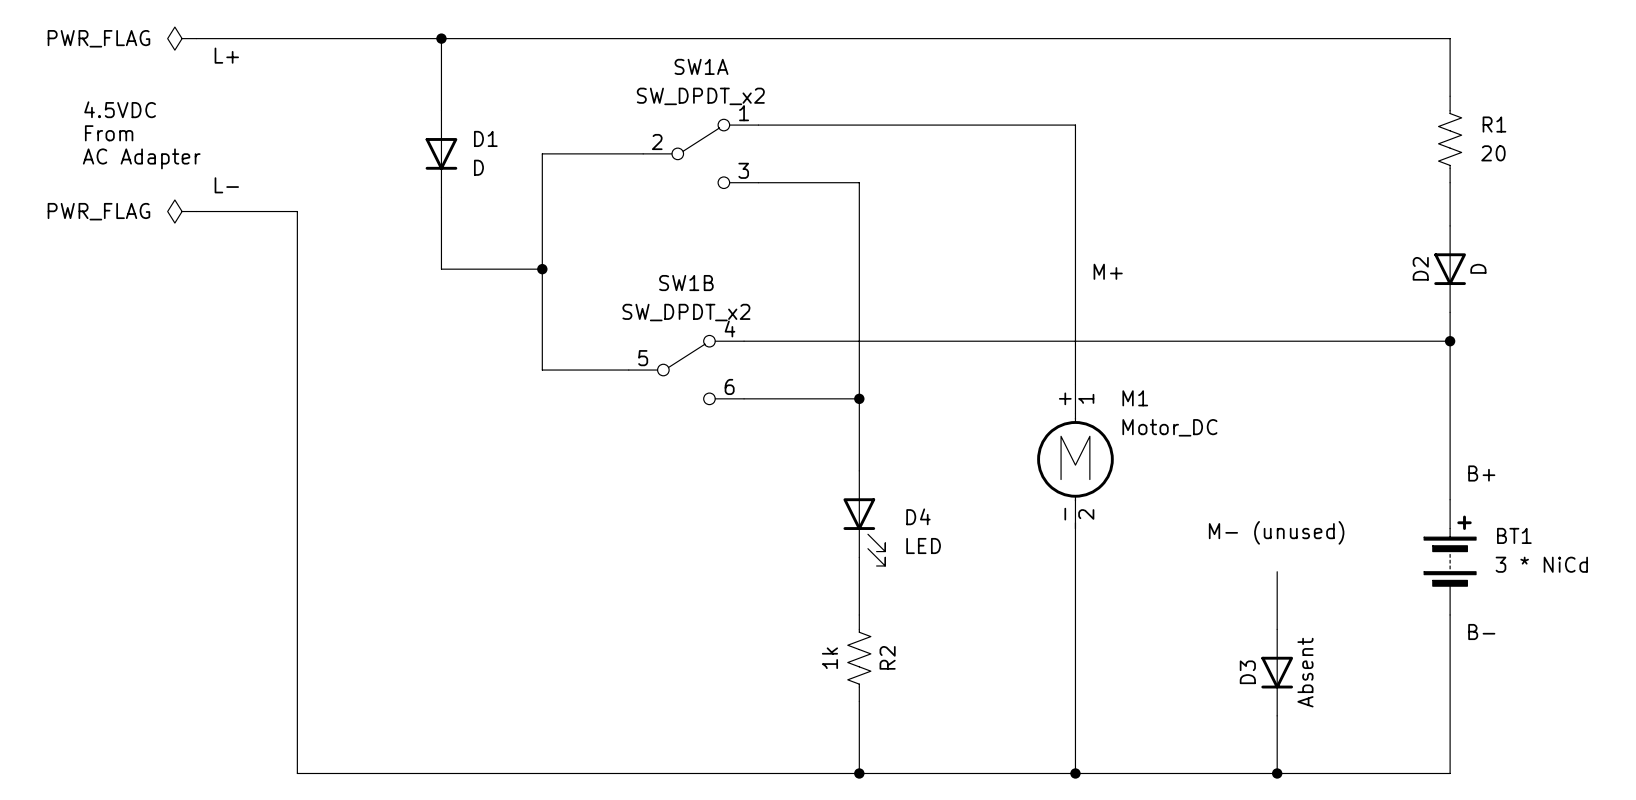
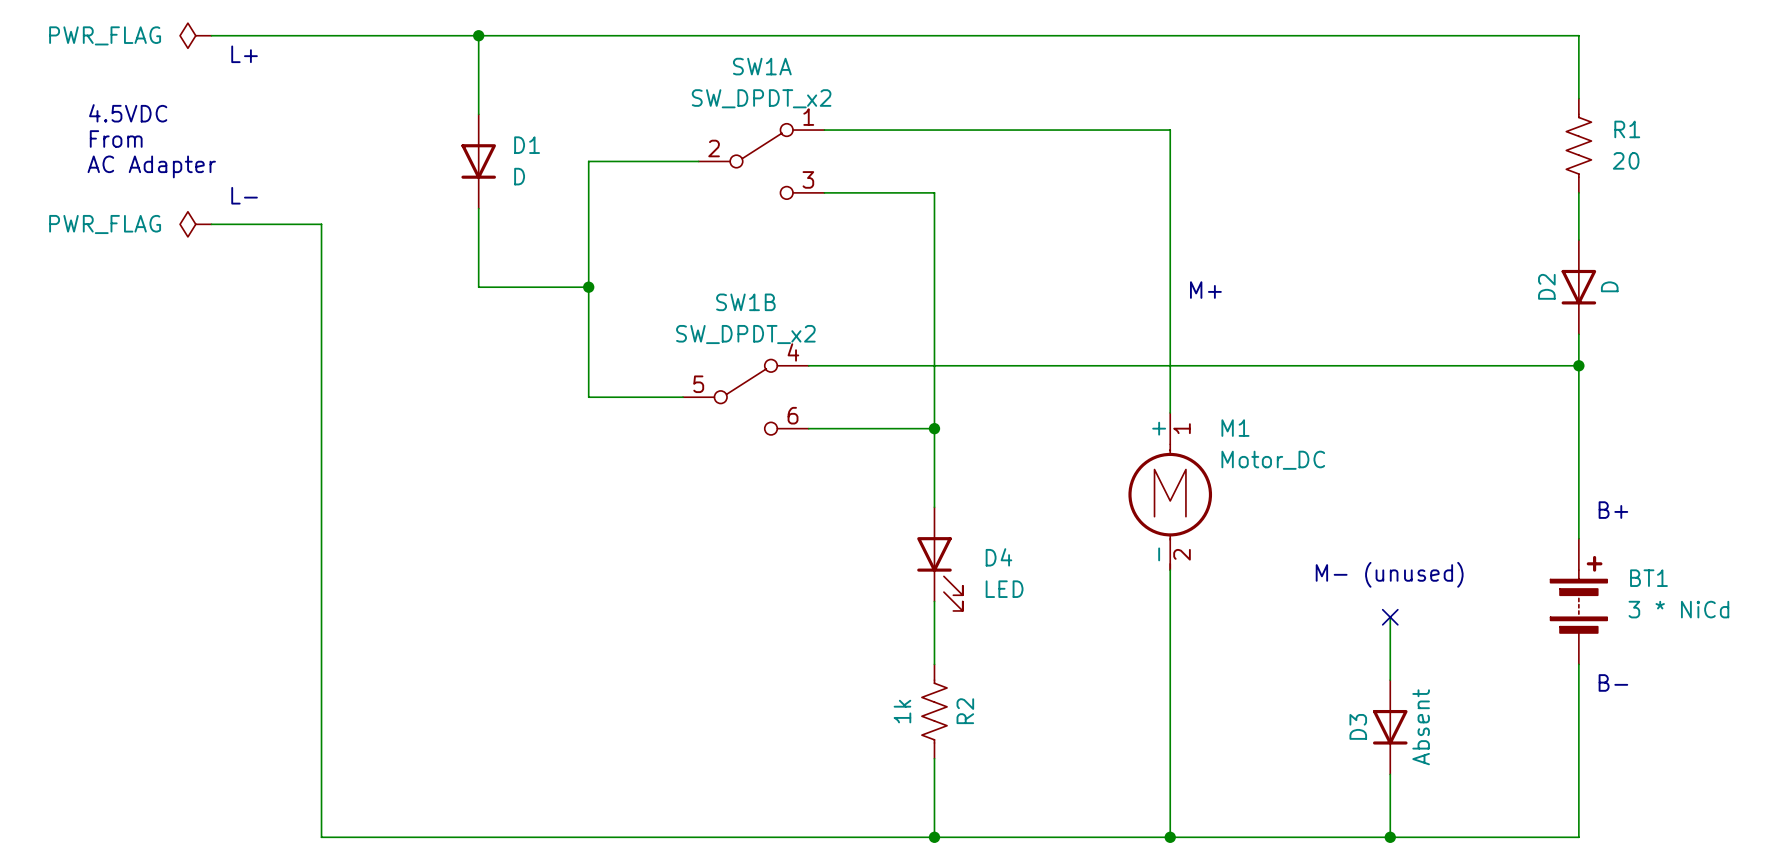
no-connect mark: none -> (1390, 617)

